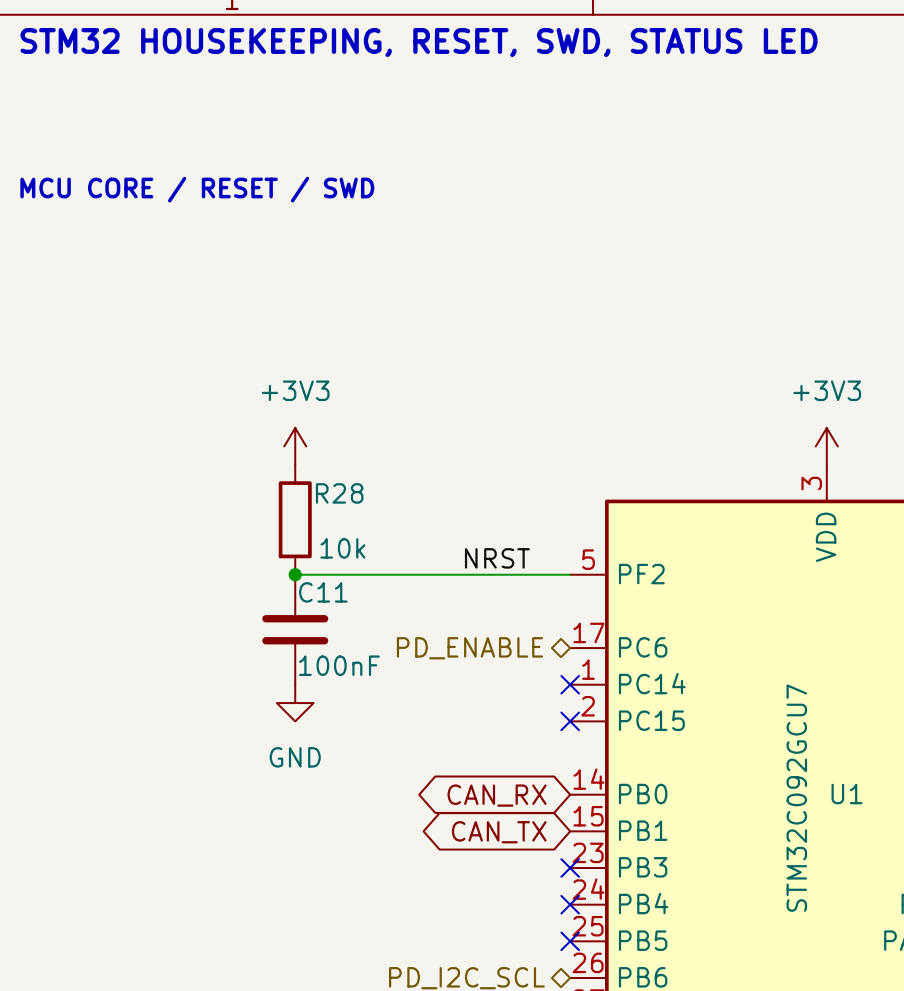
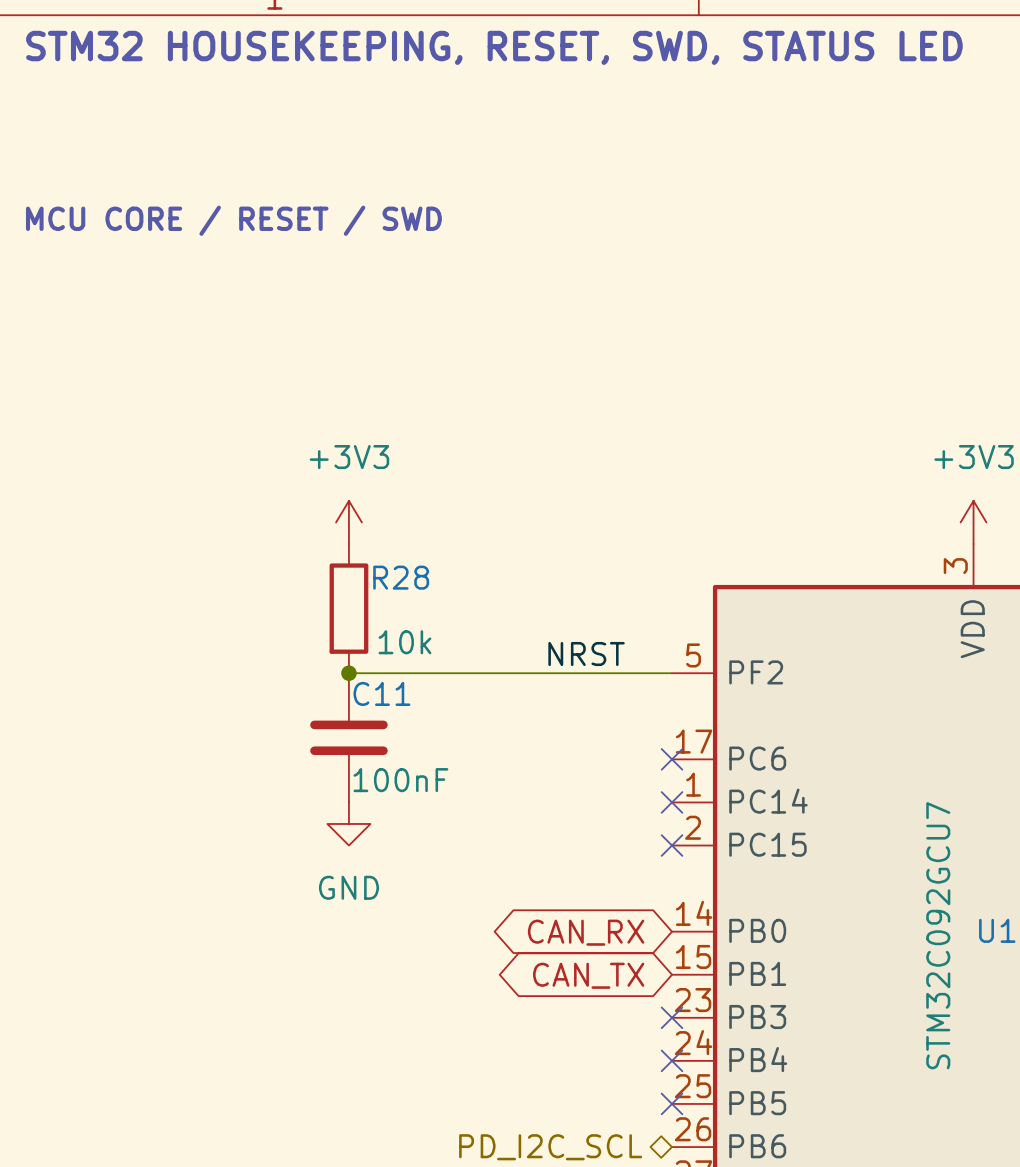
hierarchical label: PD_ENABLE (469, 648) -> none
no-connect mark: none -> (672, 759)

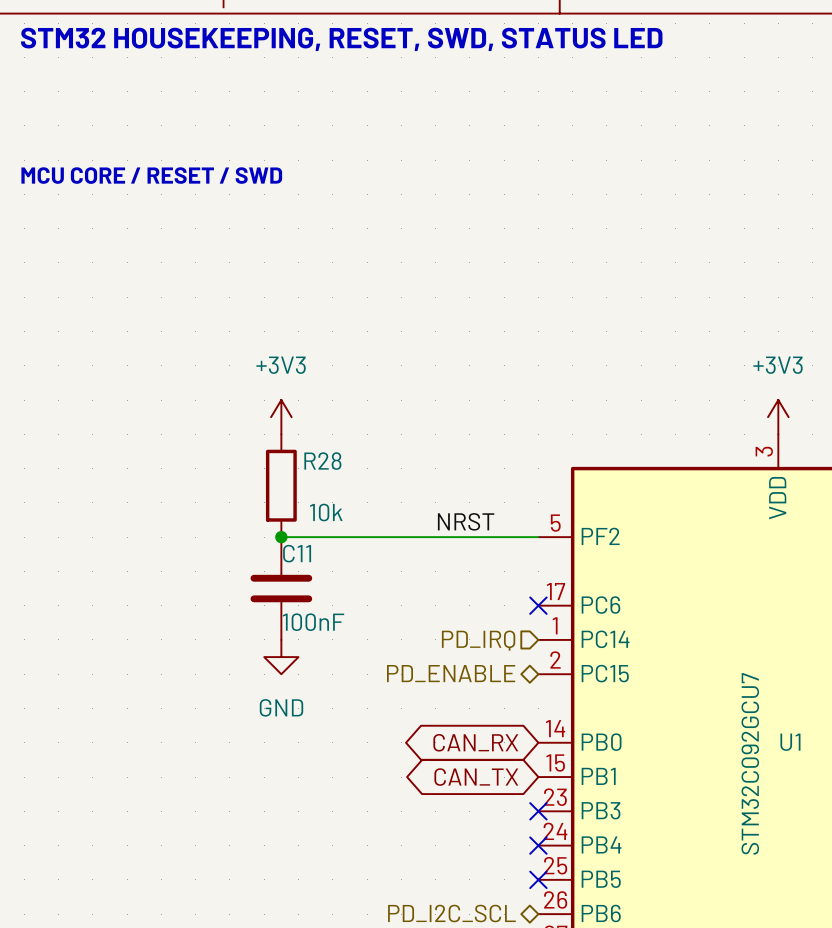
hierarchical label: none -> PD_IRQ (478, 640)
no-connect mark: (672, 802) -> none
hierarchical label: none -> PD_ENABLE (451, 673)
no-connect mark: (672, 845) -> none

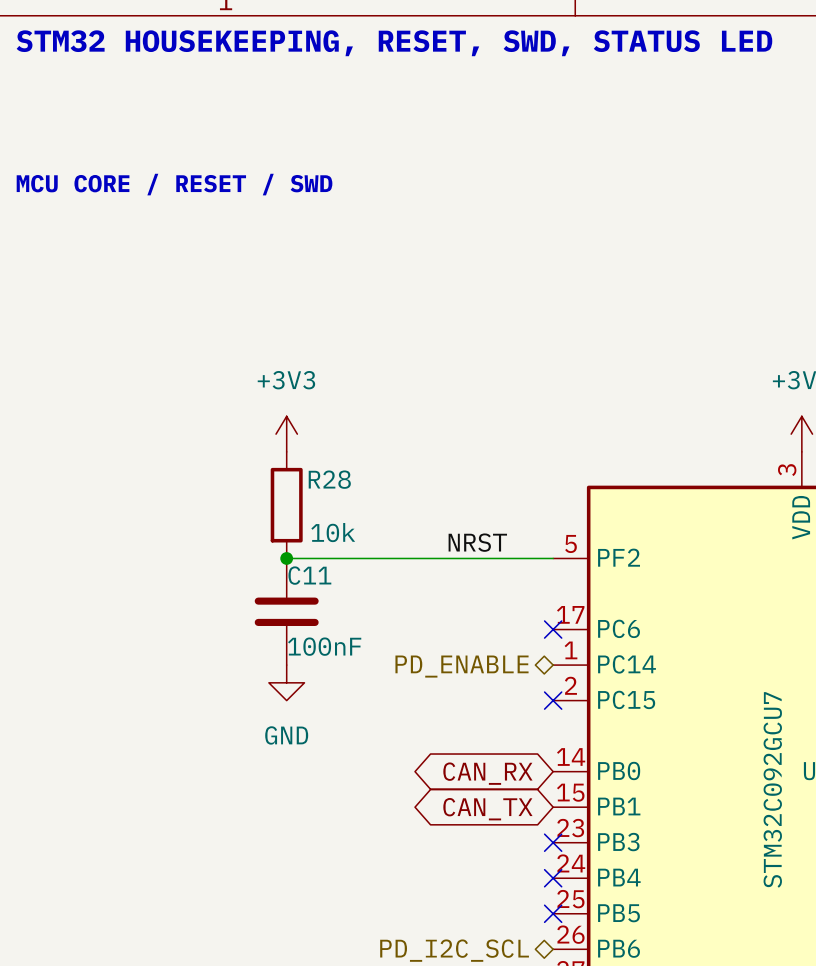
hierarchical label shape: input (478, 640) -> bidirectional (462, 666)
hierarchical label: PD_IRQ (478, 640) -> PD_ENABLE (462, 666)
hierarchical label: PD_ENABLE (451, 673) -> none
no-connect mark: none -> (553, 700)

